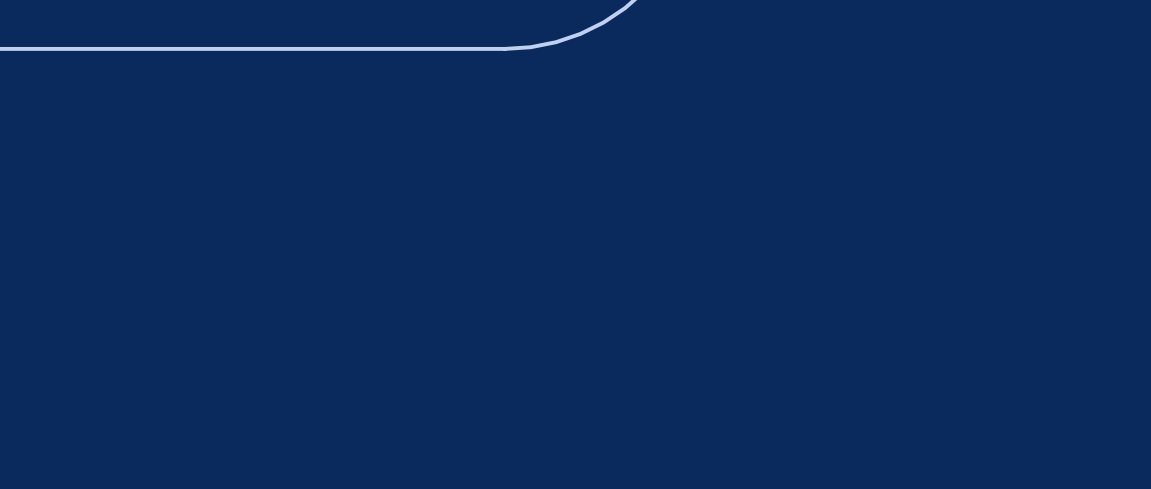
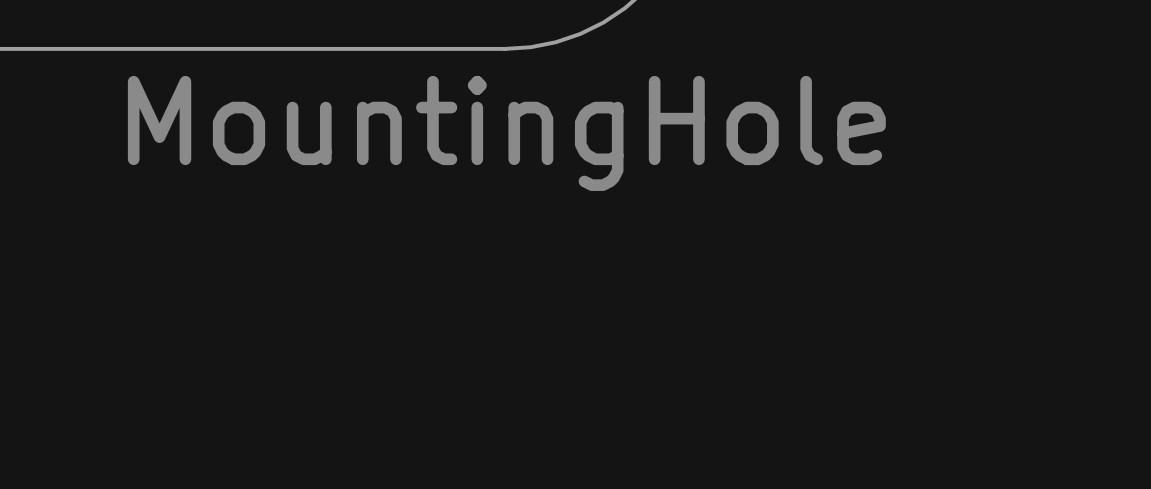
part value: none -> MountingHole (506, 133)

